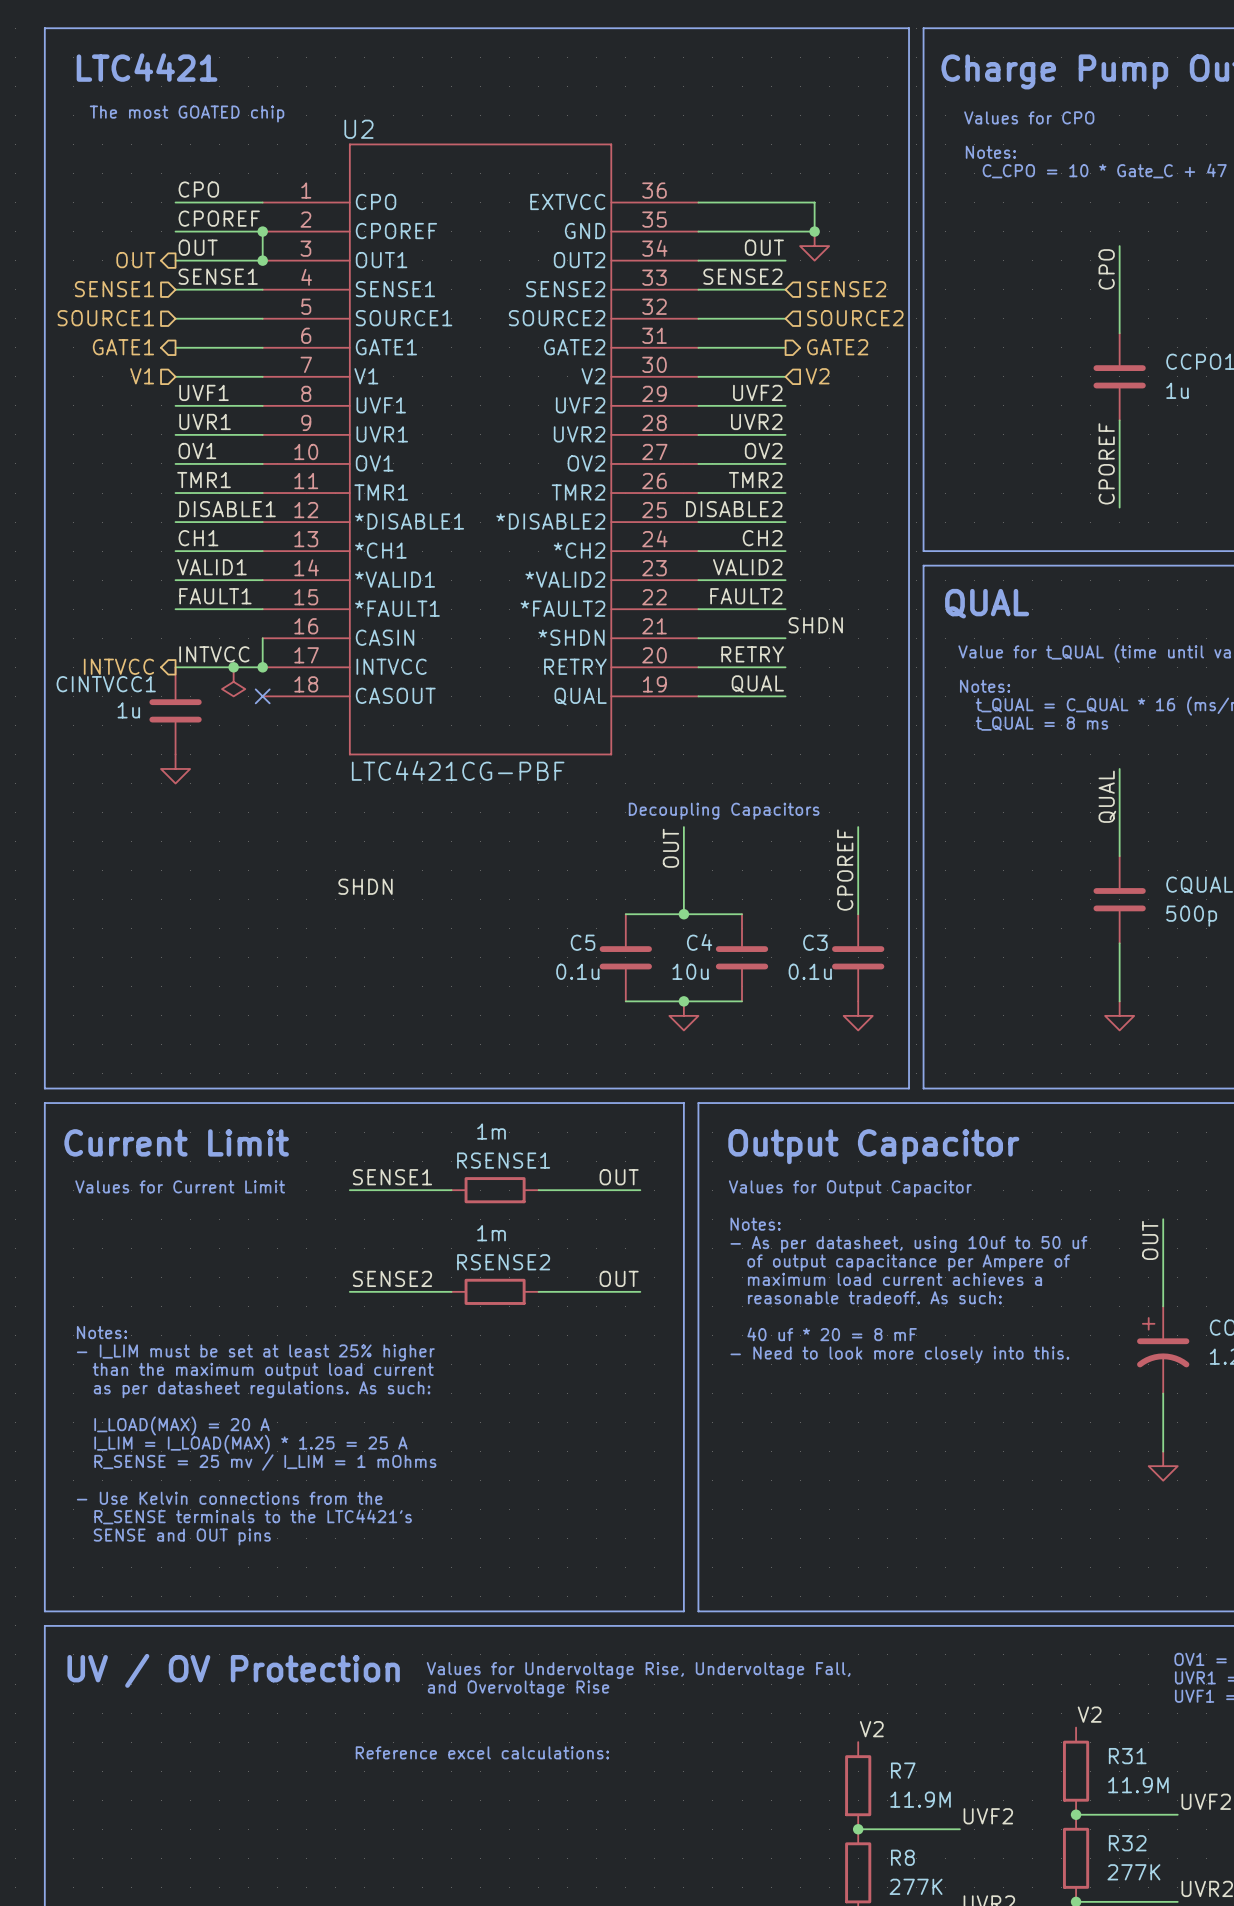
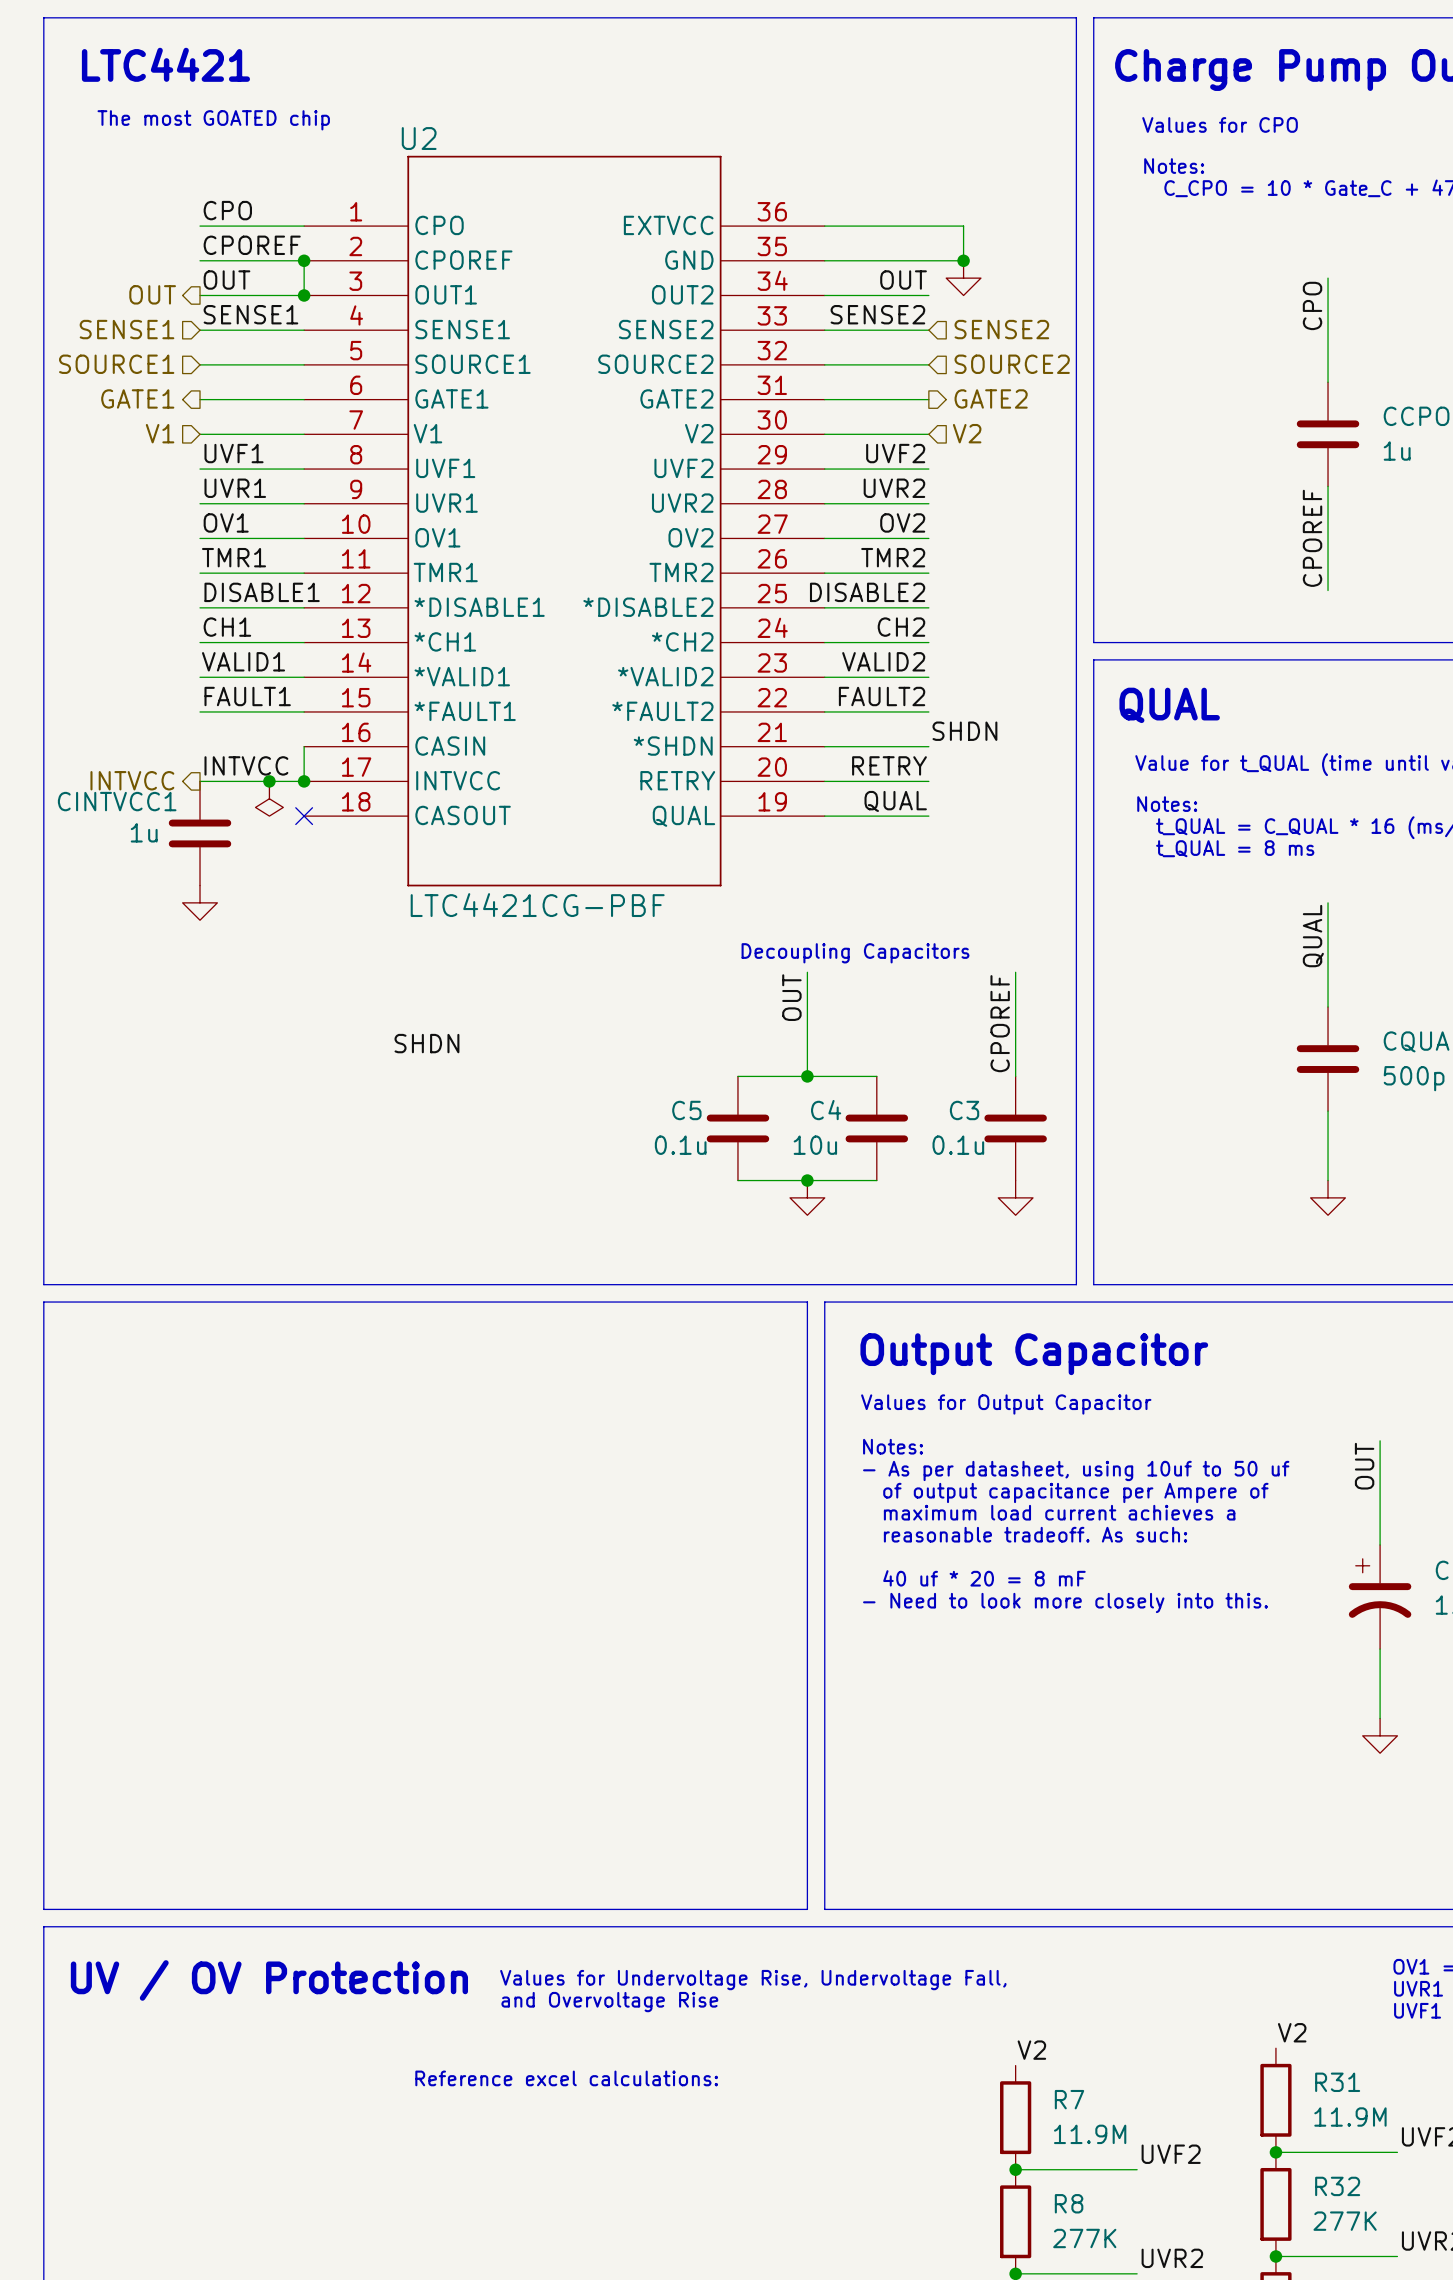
text: Current Limit (176, 1142) -> none
label: SENSE1 (392, 1177) -> none
label: OUT (619, 1177) -> none
text: Values for Current Limit (180, 1186) -> none
wire: (349, 1190) (451, 1190) -> none
RSENSE1: 1m (495, 1190) -> none
wire: (538, 1190) (640, 1190) -> none
label: SENSE2 (392, 1278) -> none
label: OUT (619, 1278) -> none
wire: (349, 1291) (451, 1291) -> none
RSENSE2: 1m (495, 1291) -> none
wire: (538, 1291) (640, 1291) -> none
text: Notes: (101, 1332) -> none
text: - I_LIM must be set at least 25% higher (255, 1352) -> none
text: than the maximum output load current (263, 1371) -> none
text: as per datasheet regulations. As such: (262, 1389) -> none
text: I_LOAD(MAX) = 20 A (182, 1425) -> none
text: I_LIM = I_LOAD(MAX) * 1.25 = 25 A (250, 1444) -> none
text: R_SENSE = 25 mv / I_LIM = 1 mOhms (265, 1462) -> none
text: - Use Kelvin connections from the (229, 1498) -> none
text: R_SENSE terminals to the LTC4421's (253, 1516) -> none
text: SENSE and OUT pins (182, 1536) -> none

